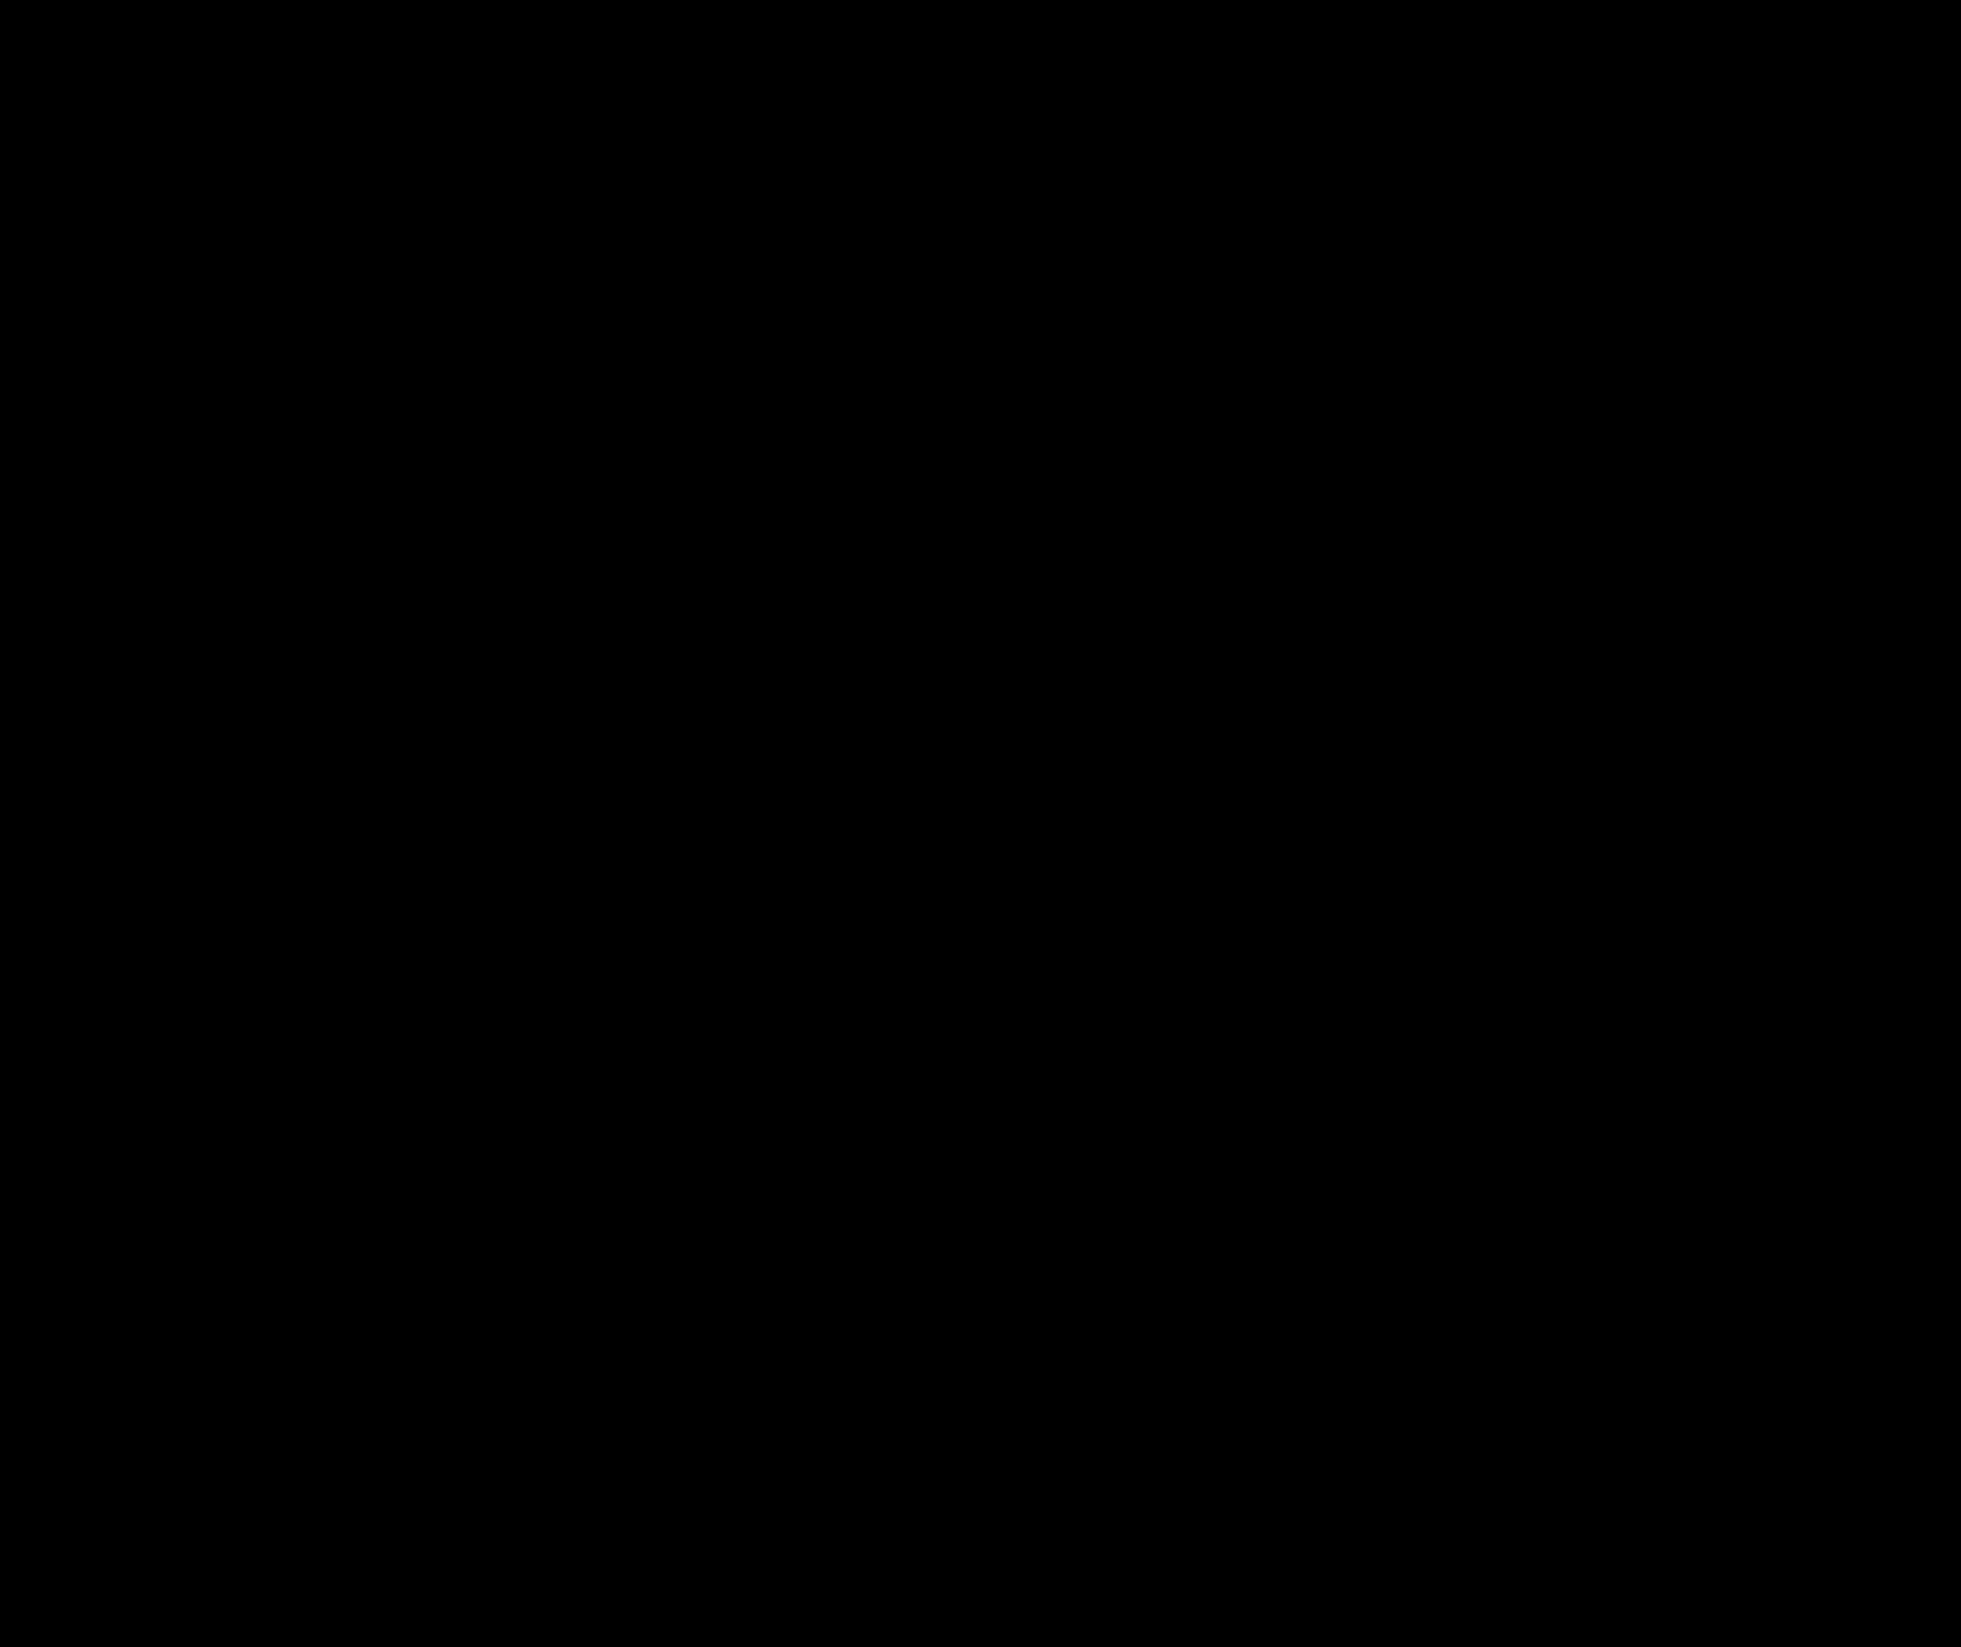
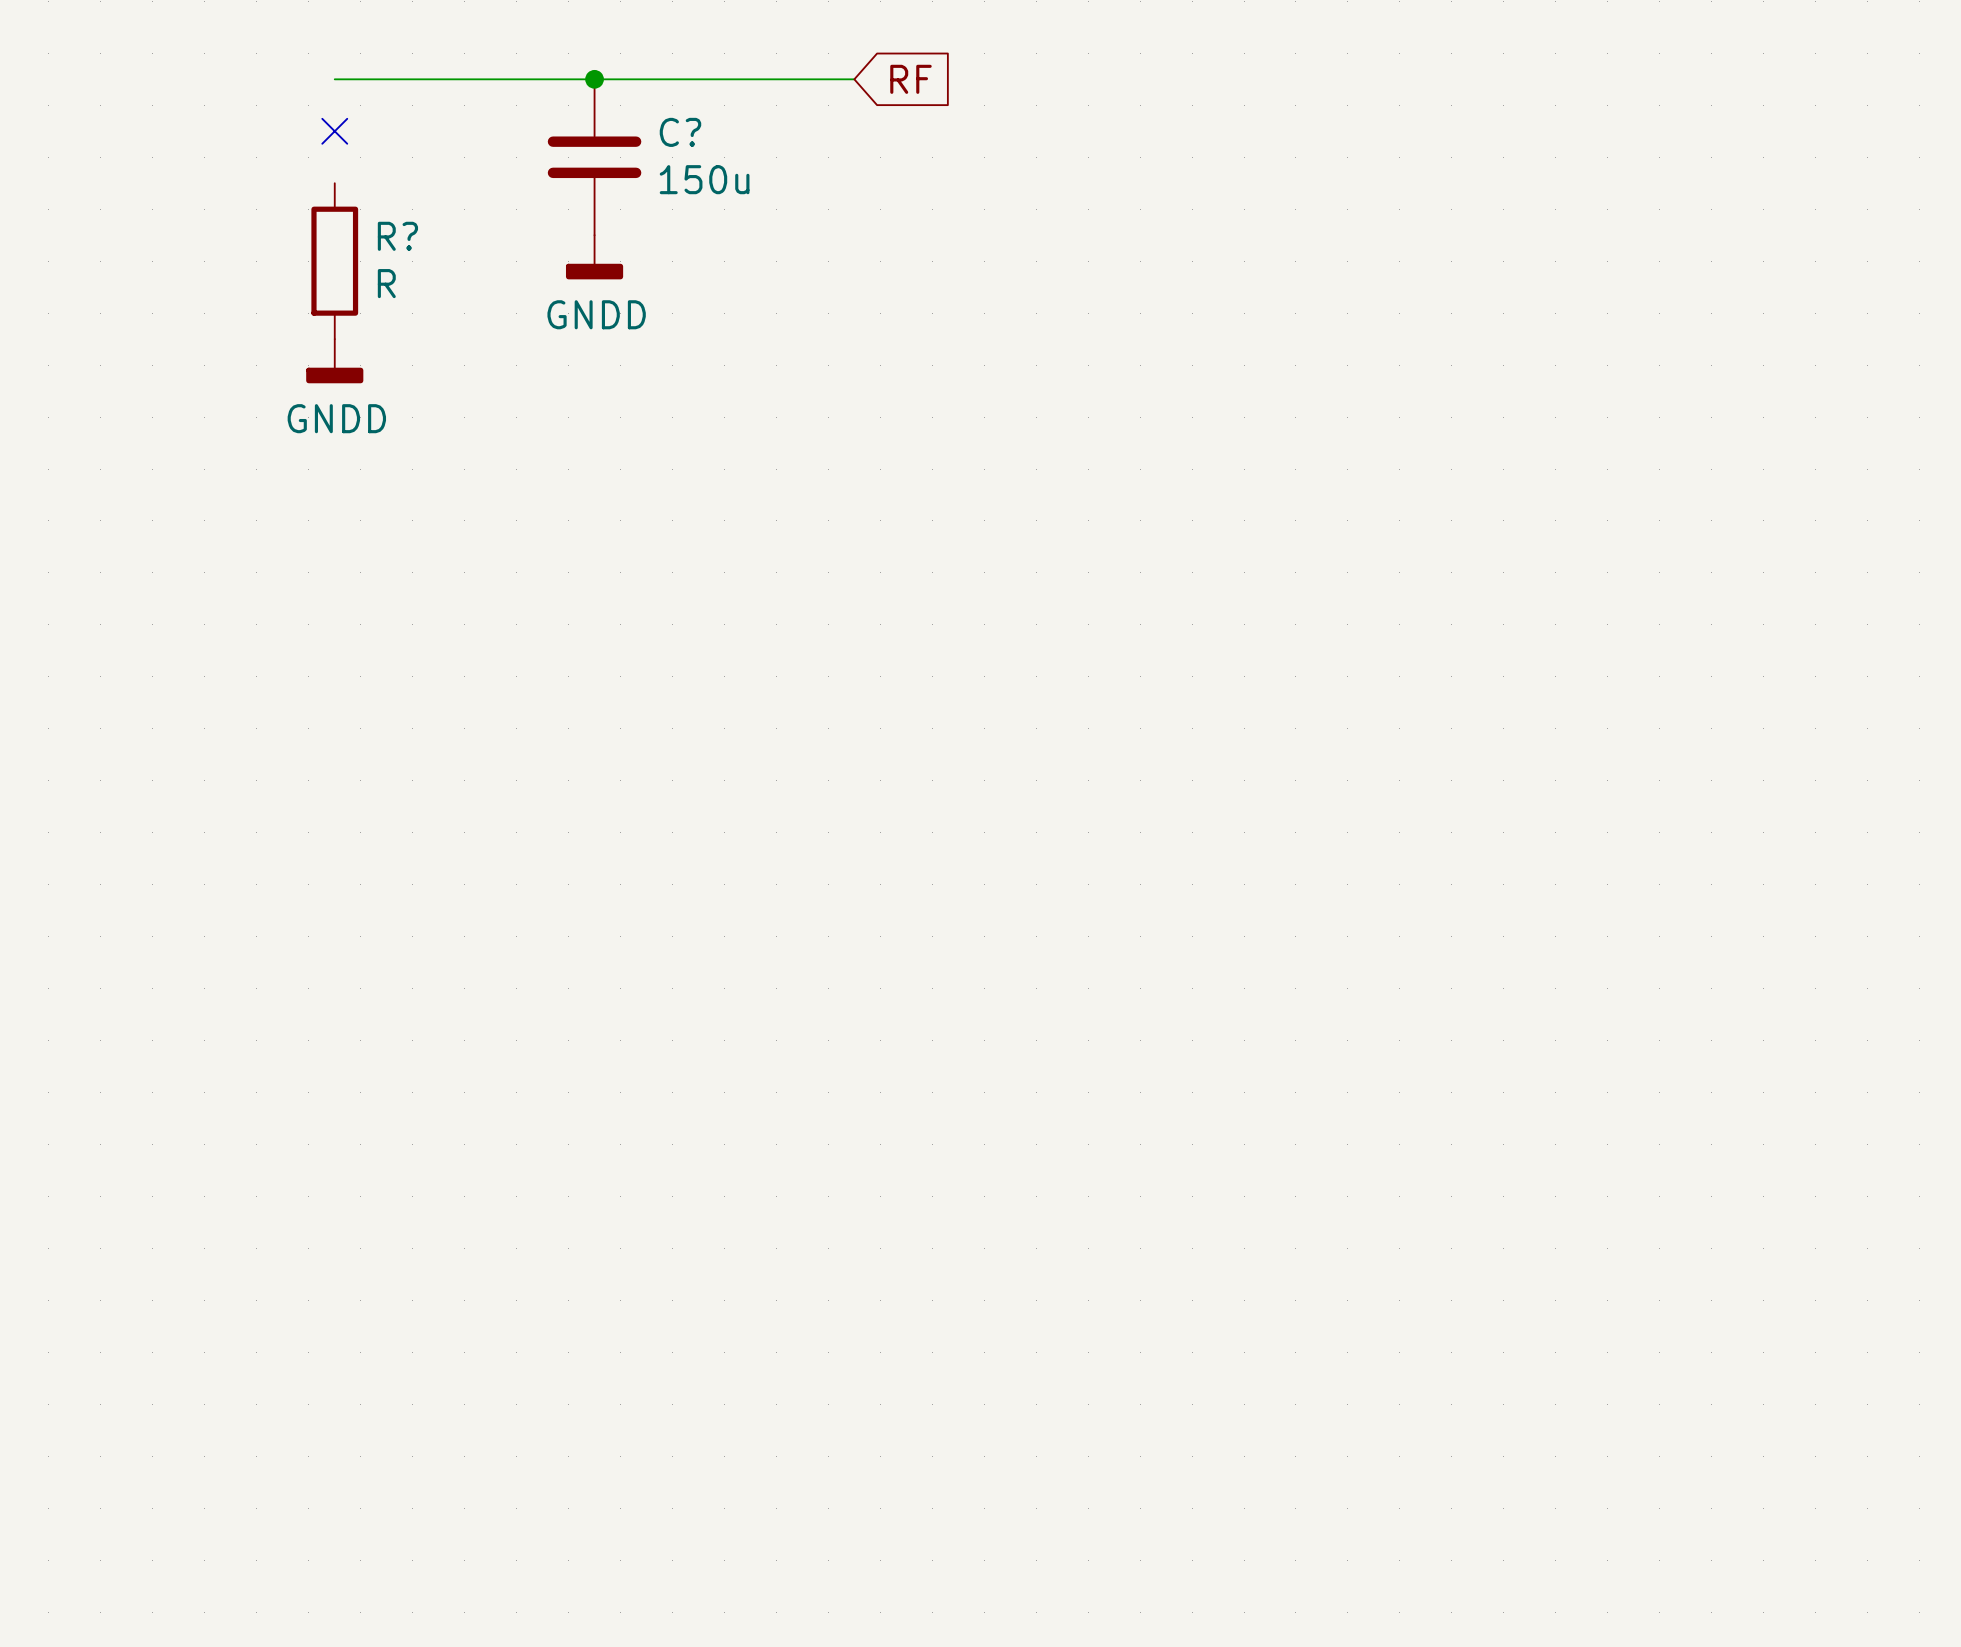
wire: none -> (334, 79) (854, 79)
junction: none -> (594, 79)
global label: none -> RF (910, 79)
no-connect mark: none -> (334, 131)
C?: none -> 150u (594, 157)
power symbol: none -> GNDD (594, 257)
R?: none -> R (334, 261)
power symbol: none -> GNDD (334, 361)

